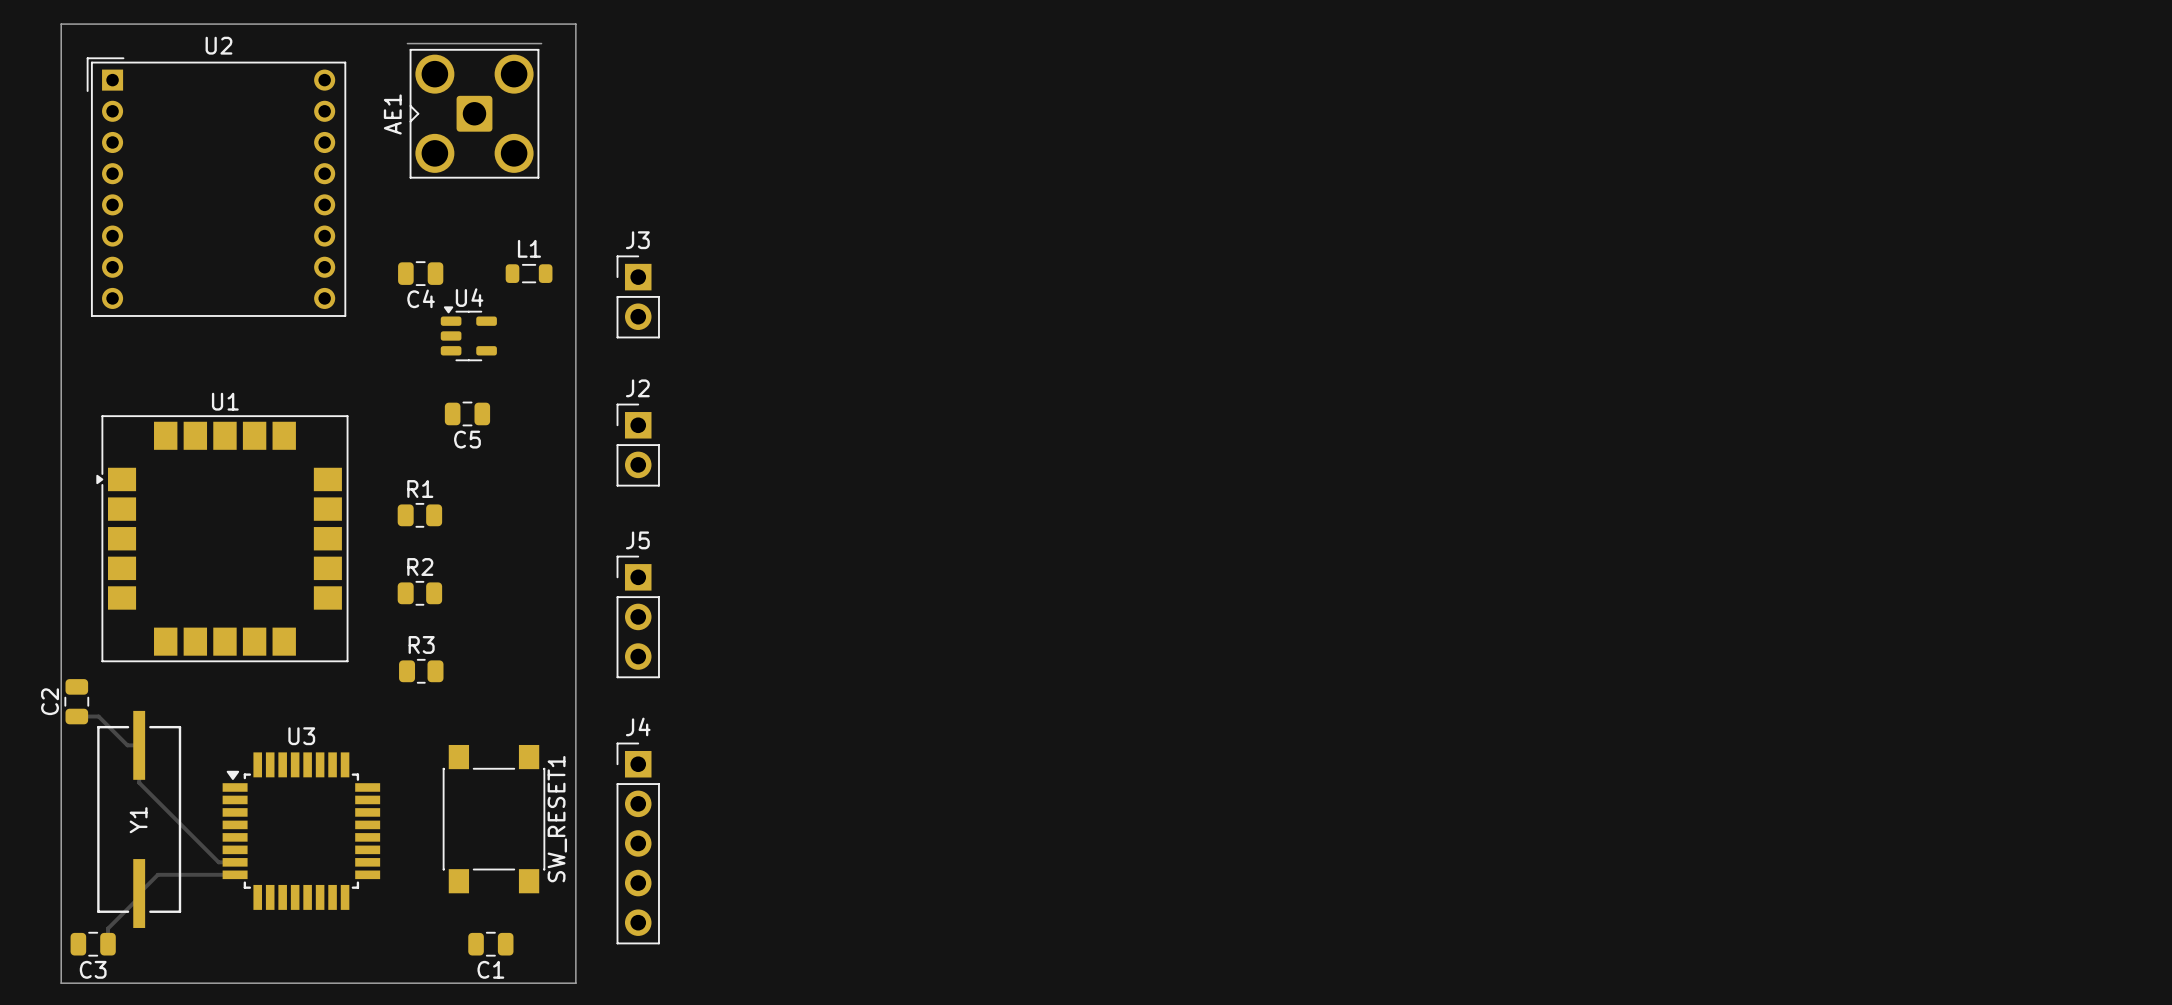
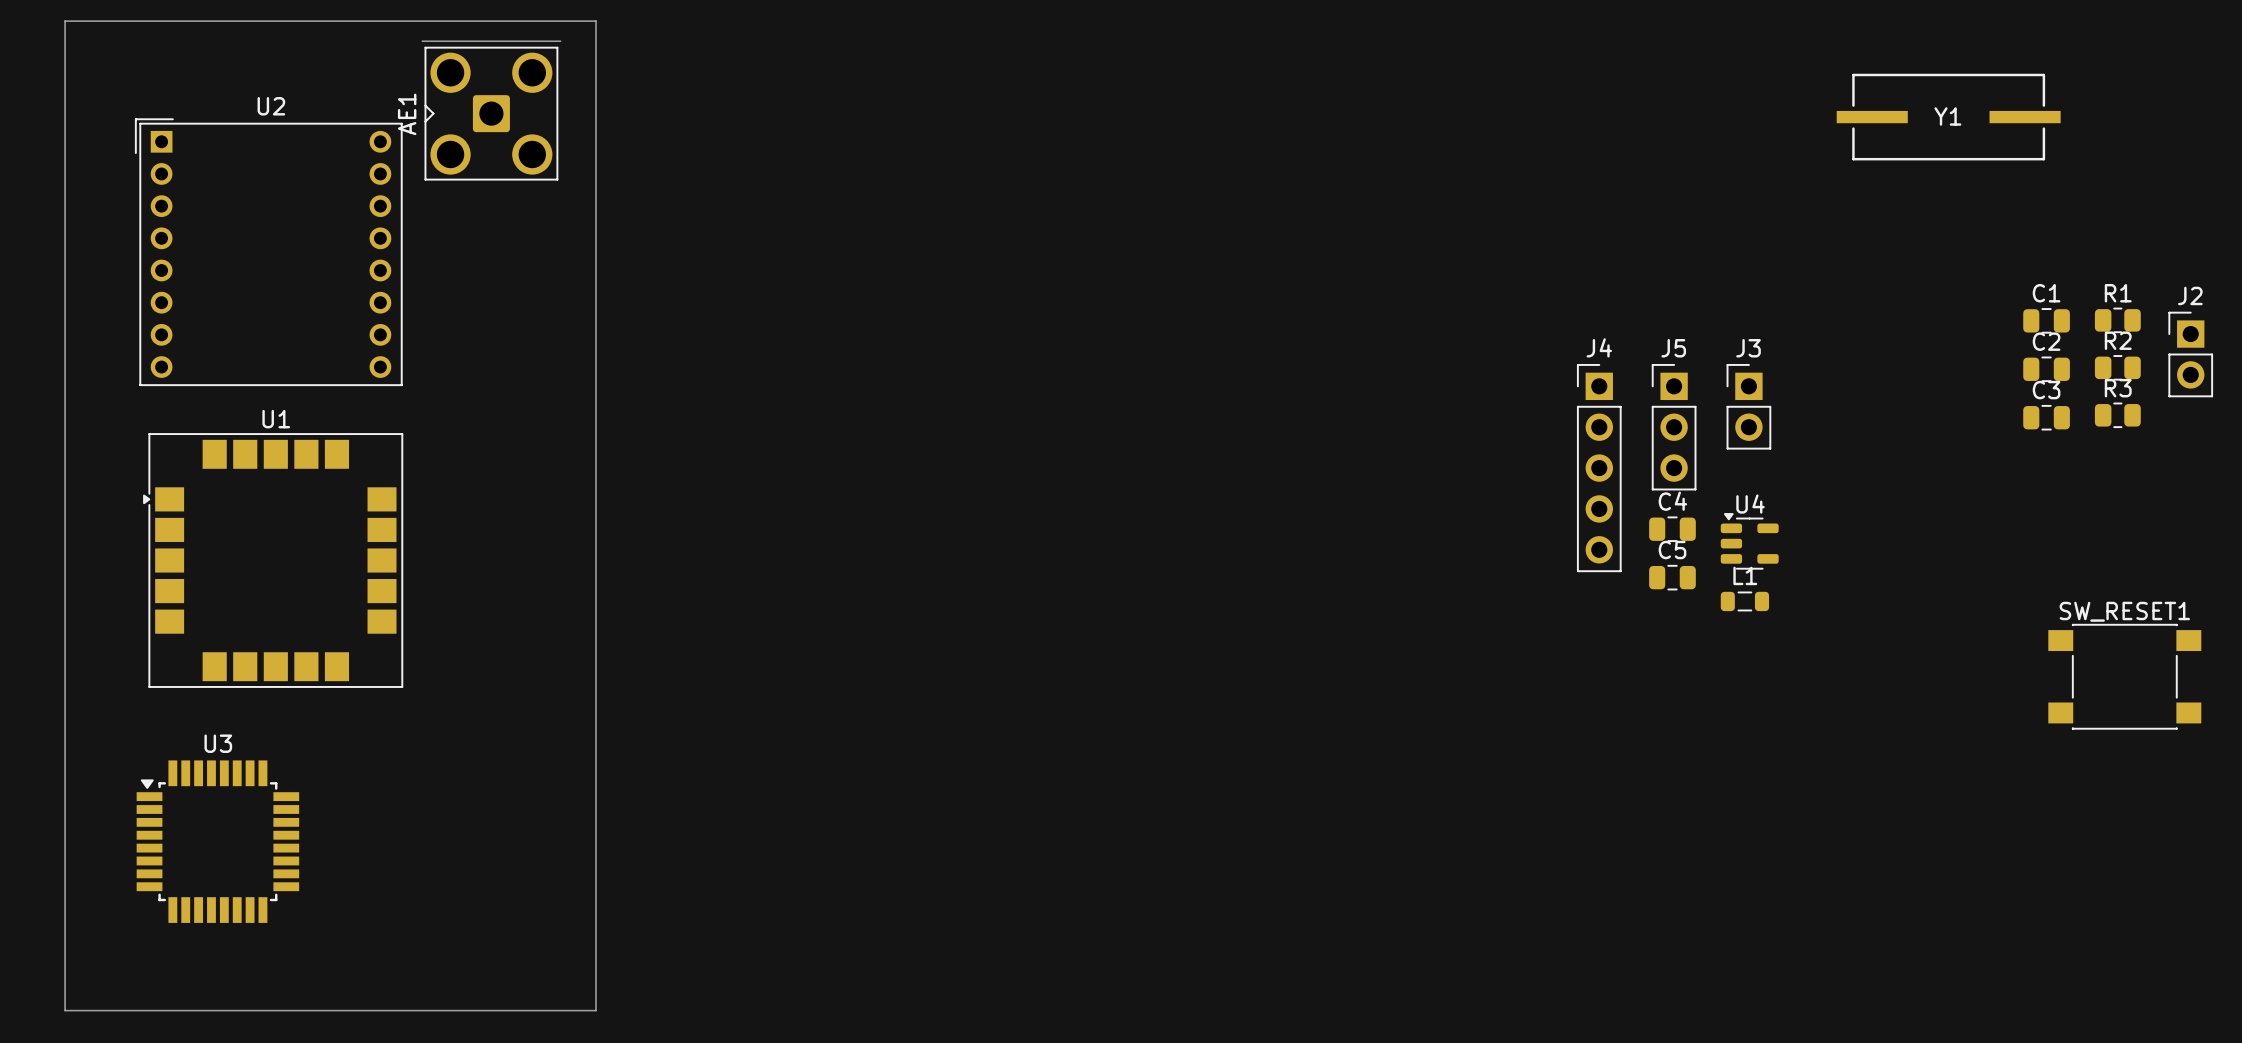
U2 position: (216, 187) -> (268, 252)
C4 position: (420, 273) -> (1672, 529)
L1 position: (529, 273) -> (1744, 601)
J3 position: (638, 296) -> (1748, 406)
C4 name position: C4 (421, 298) -> C4 (1672, 501)
U4 position: (468, 333) -> (1749, 541)
C5 position: (467, 413) -> (1672, 577)
C5 name position: C5 (467, 439) -> C5 (1672, 550)
J2 position: (638, 445) -> (2190, 354)
R1 position: (419, 515) -> (2117, 320)
U1 position: (222, 538) -> (273, 560)
R2 position: (419, 593) -> (2117, 367)
J5 position: (638, 616) -> (1674, 427)
R3 position: (421, 671) -> (2117, 415)
C2 rotation: 0° (76, 701) -> 90° clockwise (2046, 369)
C2 position: (76, 701) -> (2046, 369)
track: (76, 716) (98, 716) (127, 745) (139, 745) (139, 782) (218, 862) (235, 862) -> none
Y1 rotation: 0° (139, 819) -> 90° clockwise (1948, 117)
Y1 position: (139, 819) -> (1948, 117)
SW_RESET1 rotation: 0° (493, 819) -> 90° clockwise (2124, 676)
SW_RESET1 position: (493, 819) -> (2124, 676)
SW_RESET1 name position: SW_RESET1 (557, 819) -> SW_RESET1 (2124, 611)
U3 position: (301, 831) -> (217, 841)
J4 position: (638, 843) -> (1599, 468)
track: (235, 874) (157, 874) (139, 893) (139, 897) (108, 928) (108, 944) -> none
C3 position: (93, 944) -> (2046, 417)
C1 position: (490, 944) -> (2046, 320)
C3 name position: C3 (93, 969) -> C3 (2046, 390)
C1 name position: C1 (490, 969) -> C1 (2046, 293)

